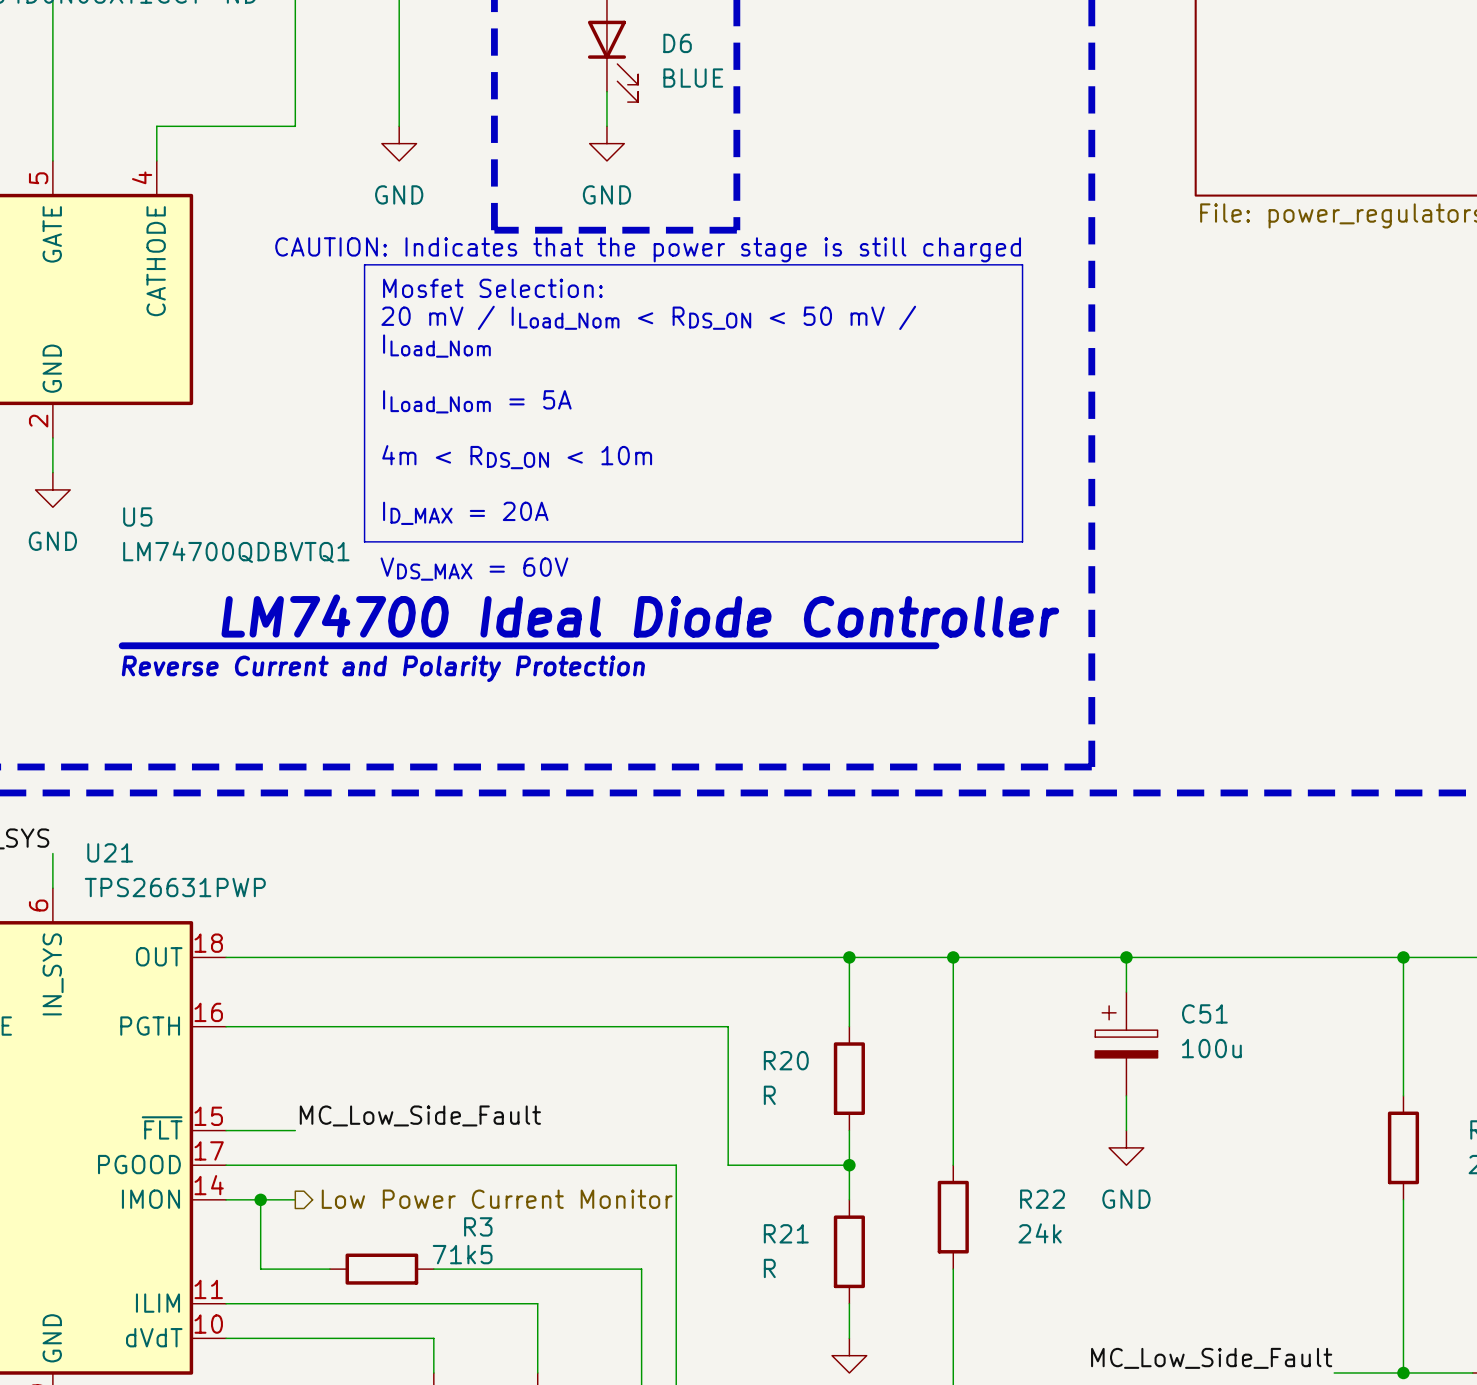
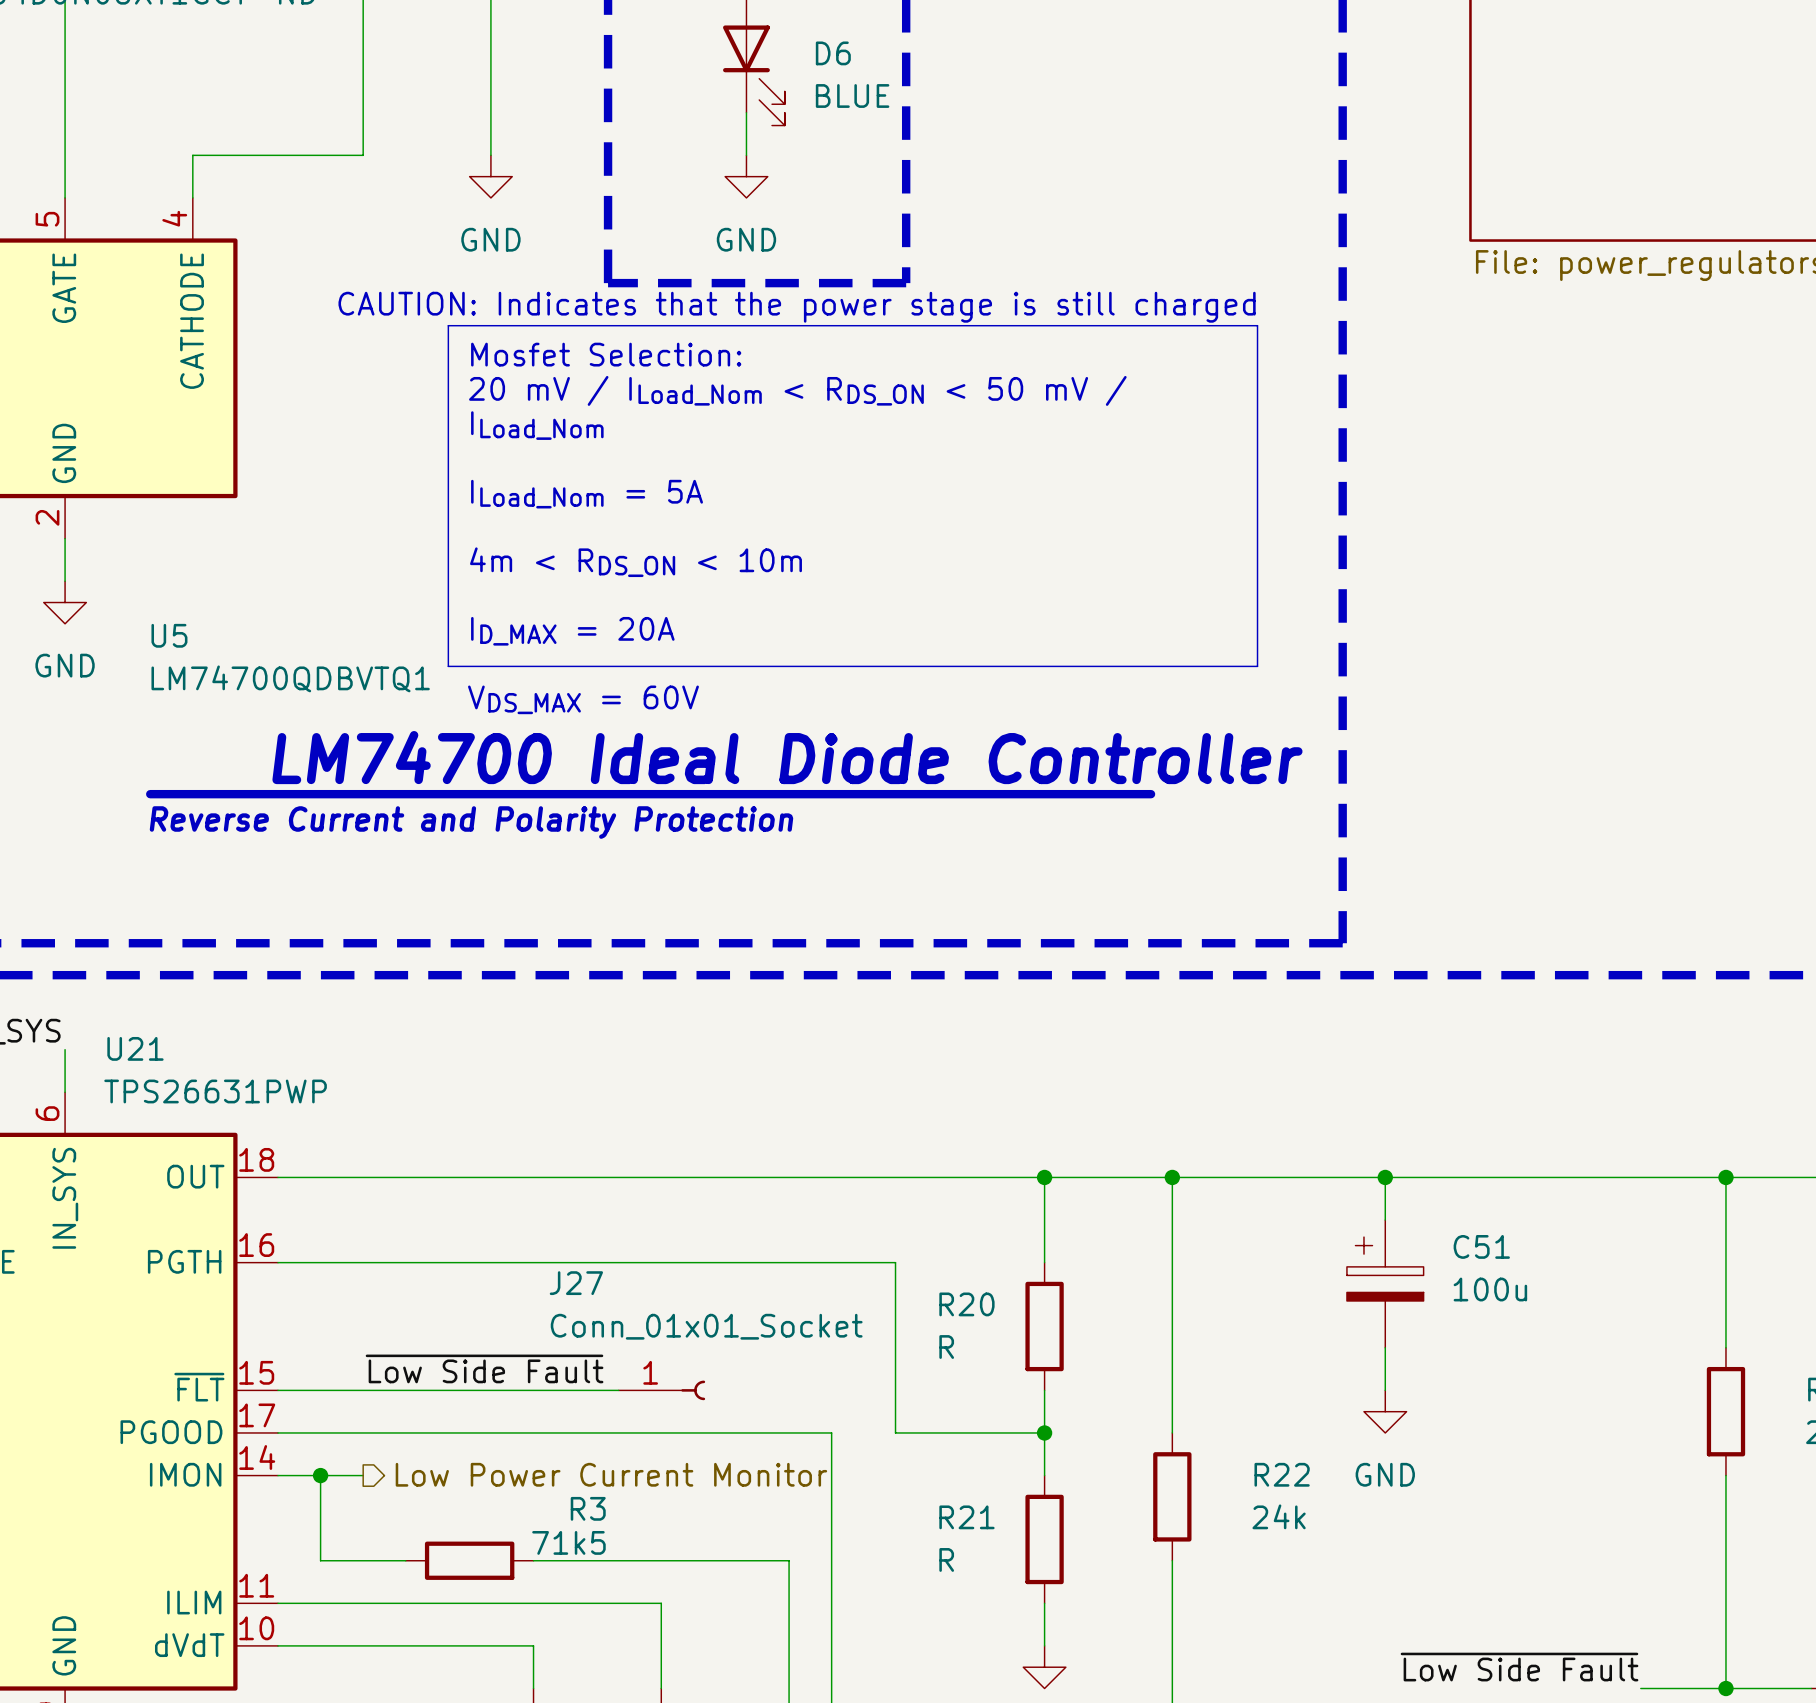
label: MC_Low_Side_Fault (420, 1115) -> ~{Low Side Fault} (484, 1368)
wire: none -> (363, 1390) (618, 1390)
J27: none -> Conn_01x01_Socket (661, 1390)
label: MC_Low_Side_Fault (1211, 1358) -> ~{Low Side Fault} (1519, 1667)

